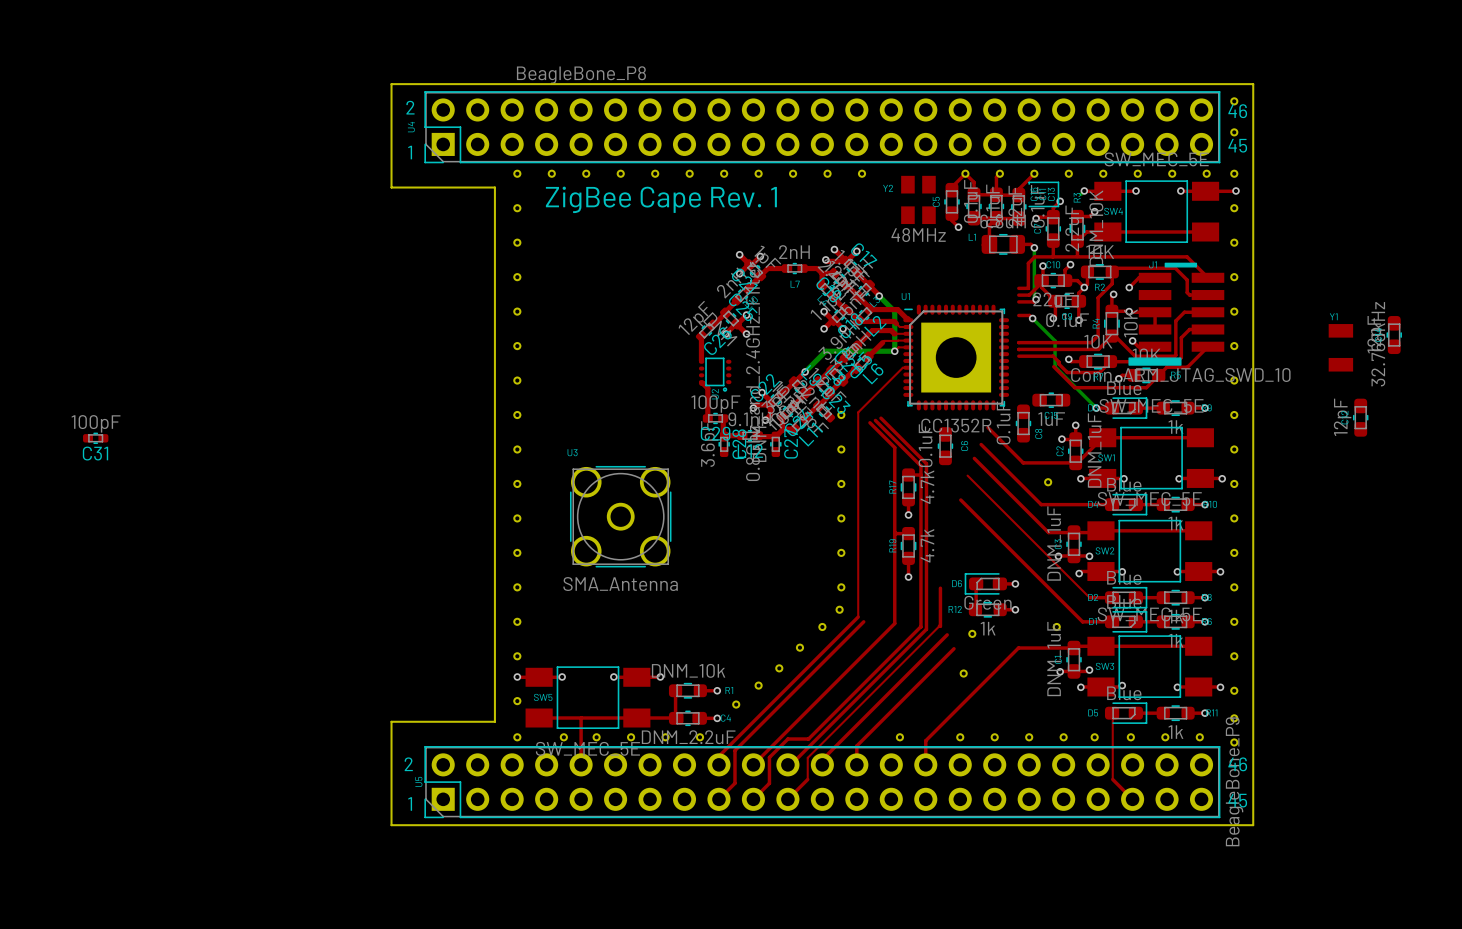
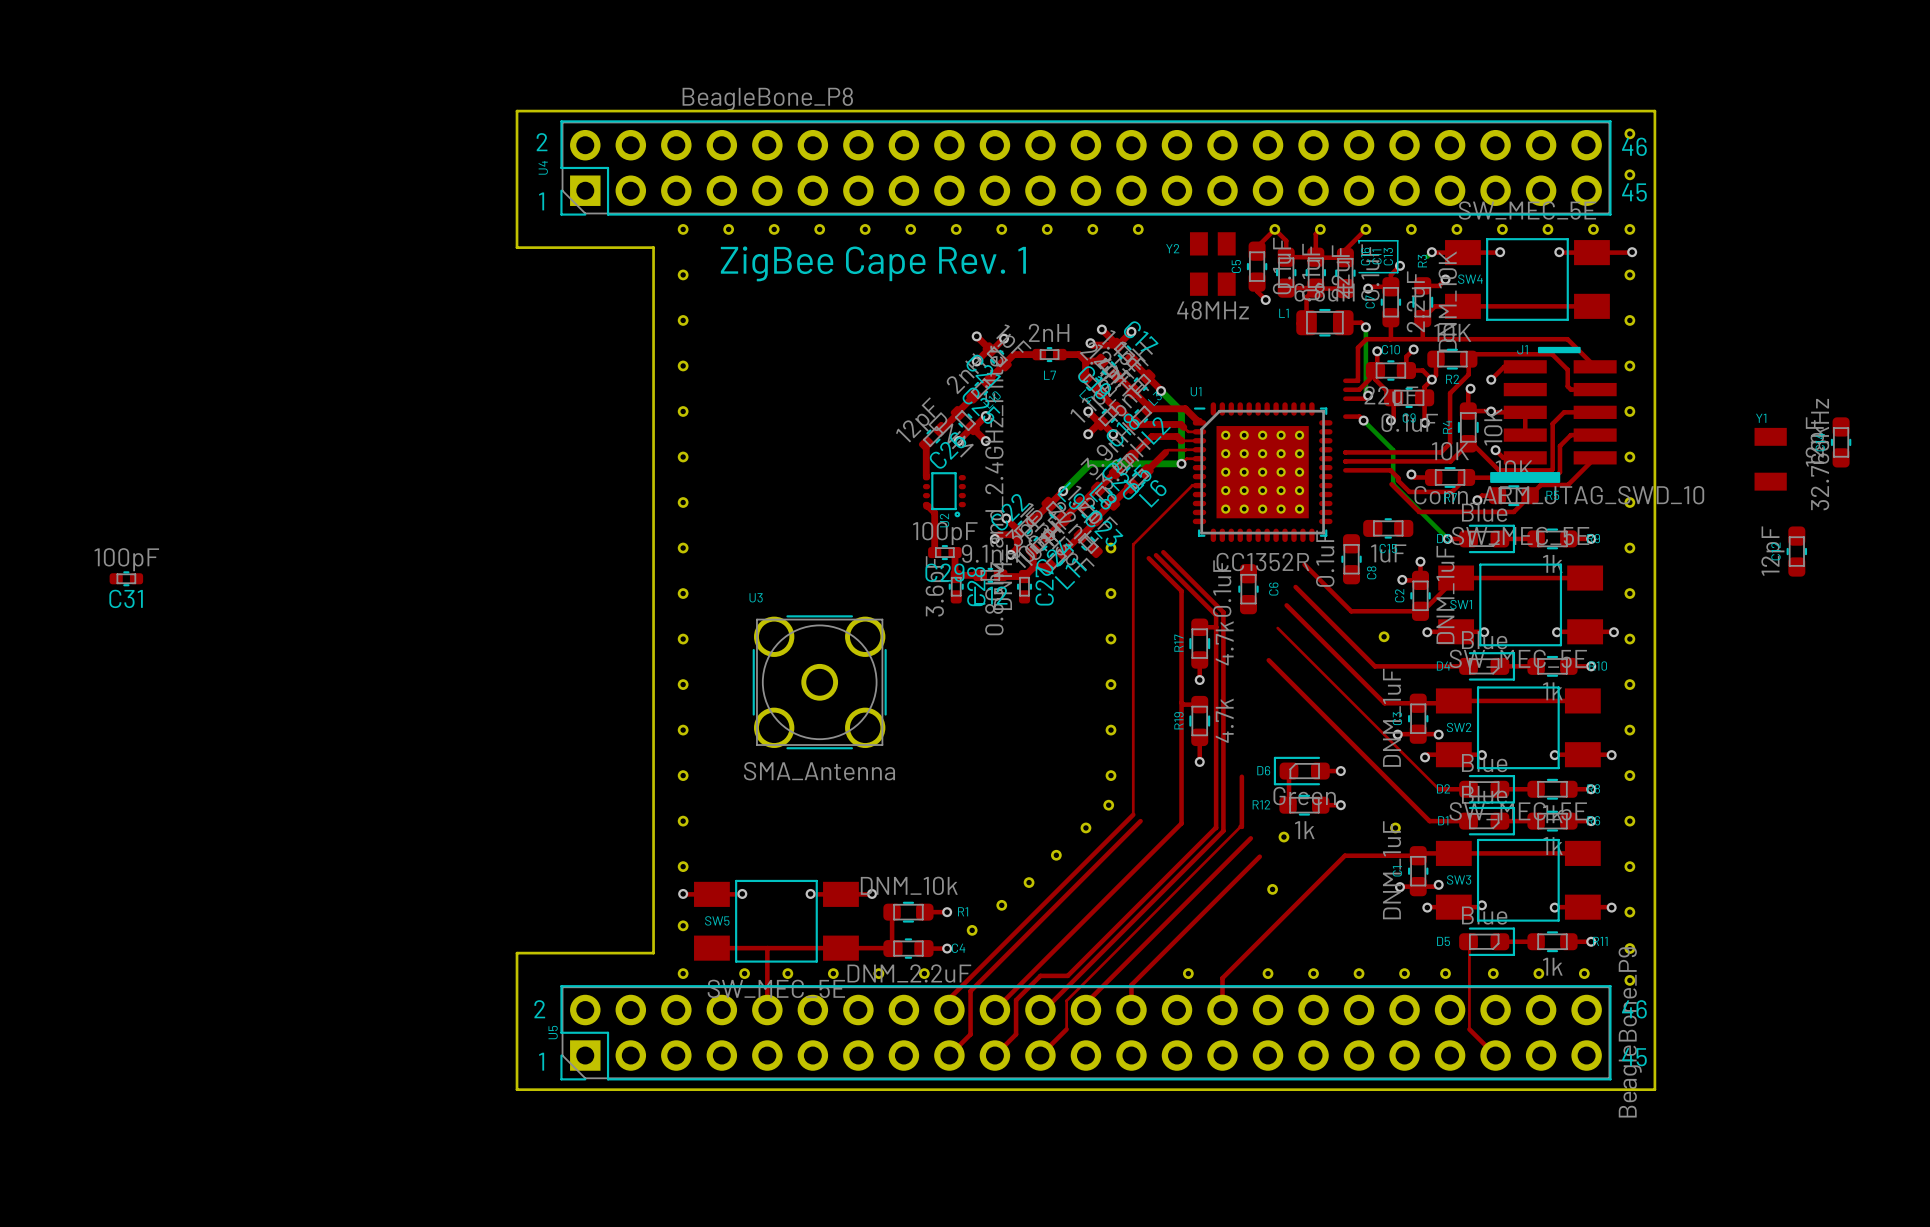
U1 footprint: [903, 304, 1010, 411] -> [1192, 402, 1333, 543]

